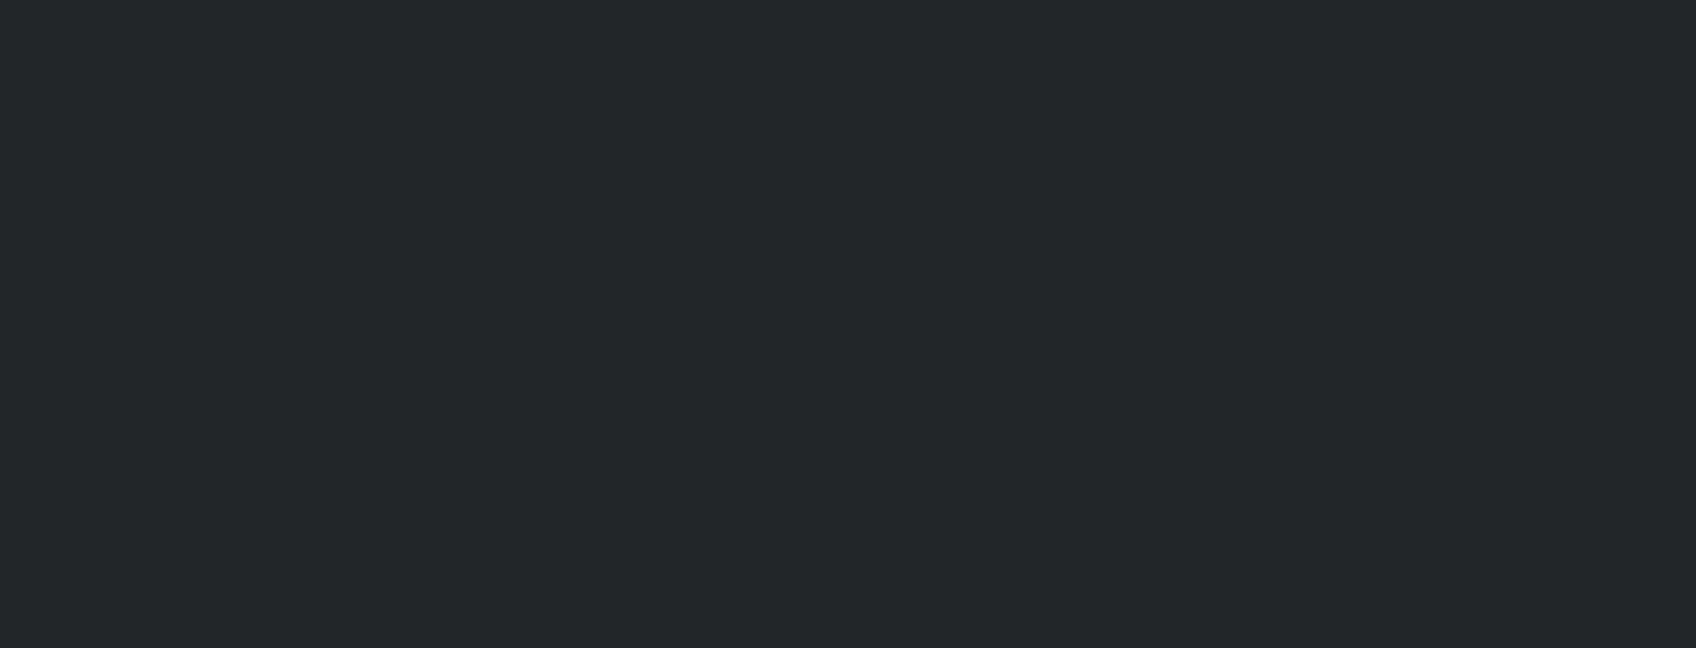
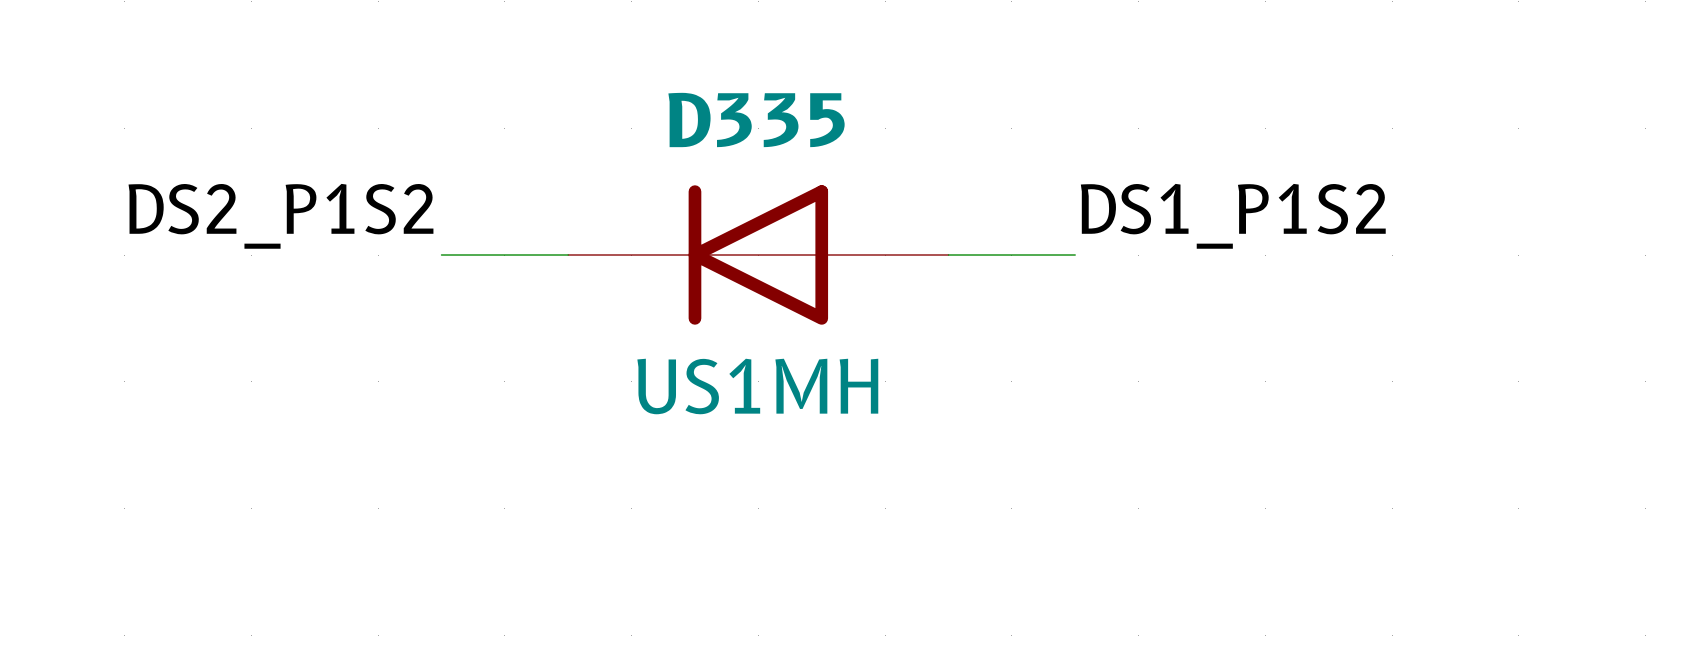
label: none -> DS2_P1S2 (280, 216)
label: none -> DS1_P1S2 (1233, 216)
wire: none -> (441, 255) (568, 255)
D335: none -> US1MH (758, 255)
wire: none -> (948, 255) (1075, 255)

